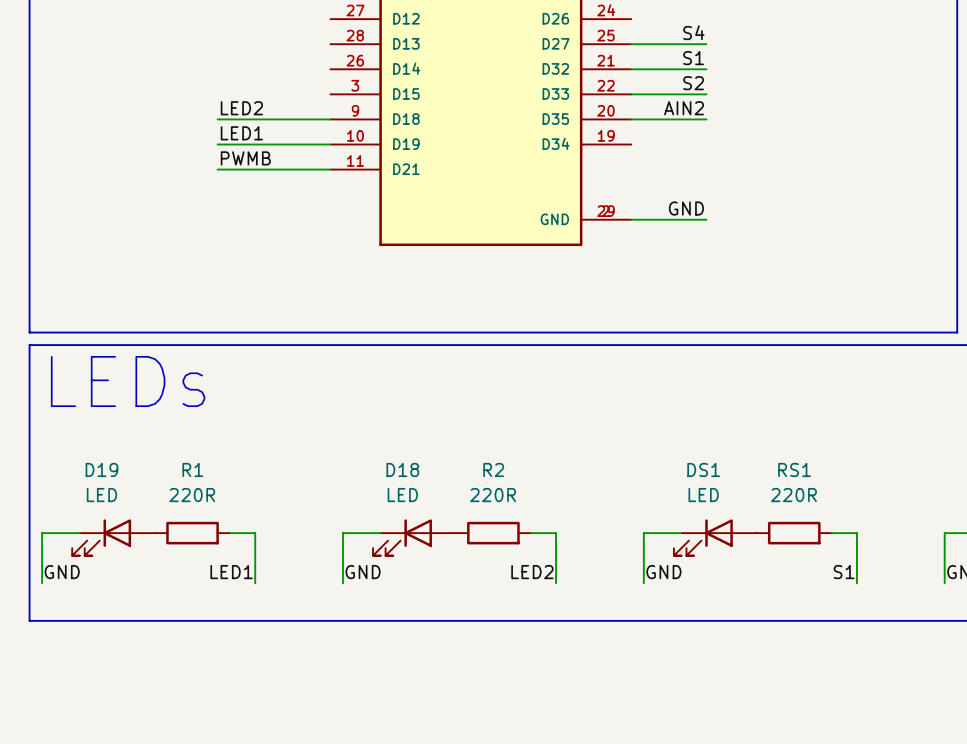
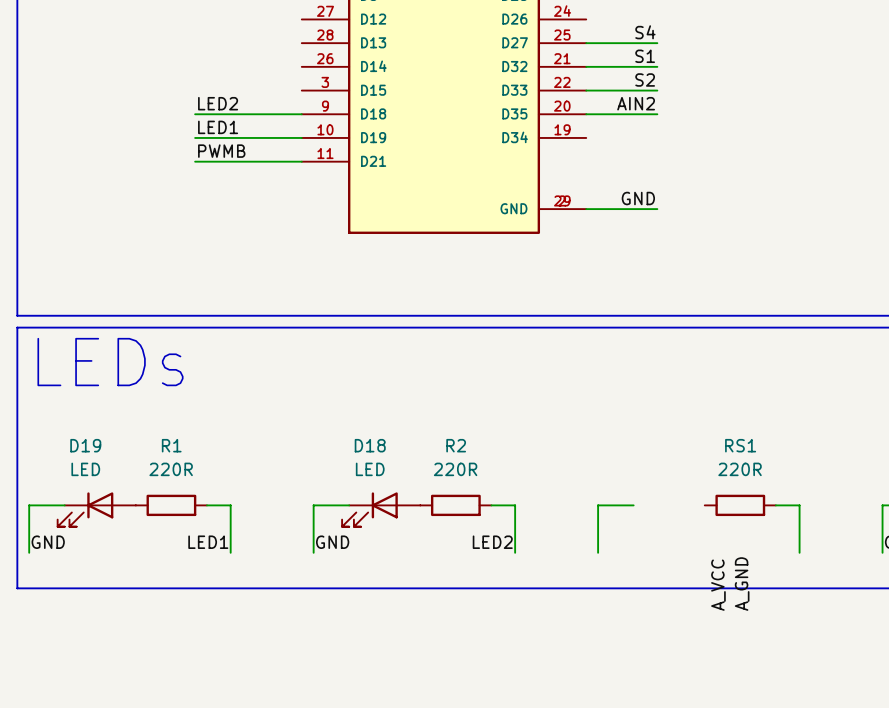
DS1: LED (715, 537) -> none
label: GND (663, 572) -> none
label: S1 (844, 572) -> none
label: none -> A_GND (742, 584)
label: none -> A_VCC (718, 585)

